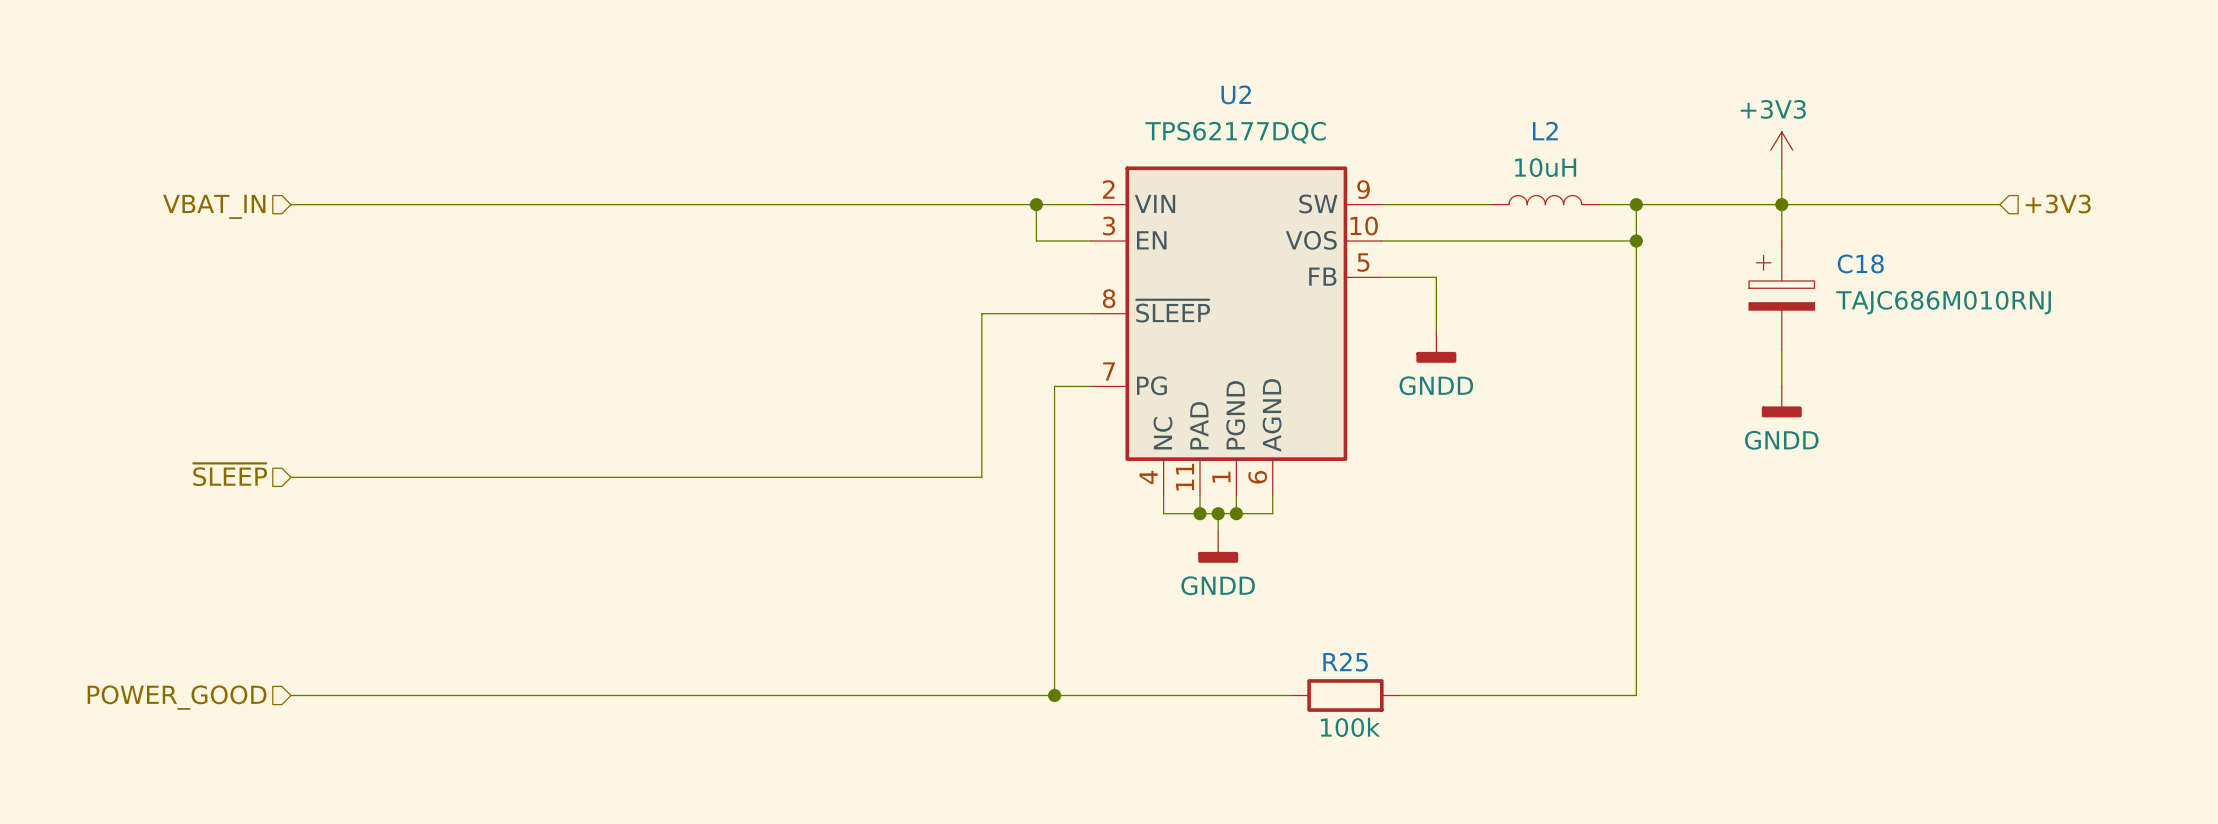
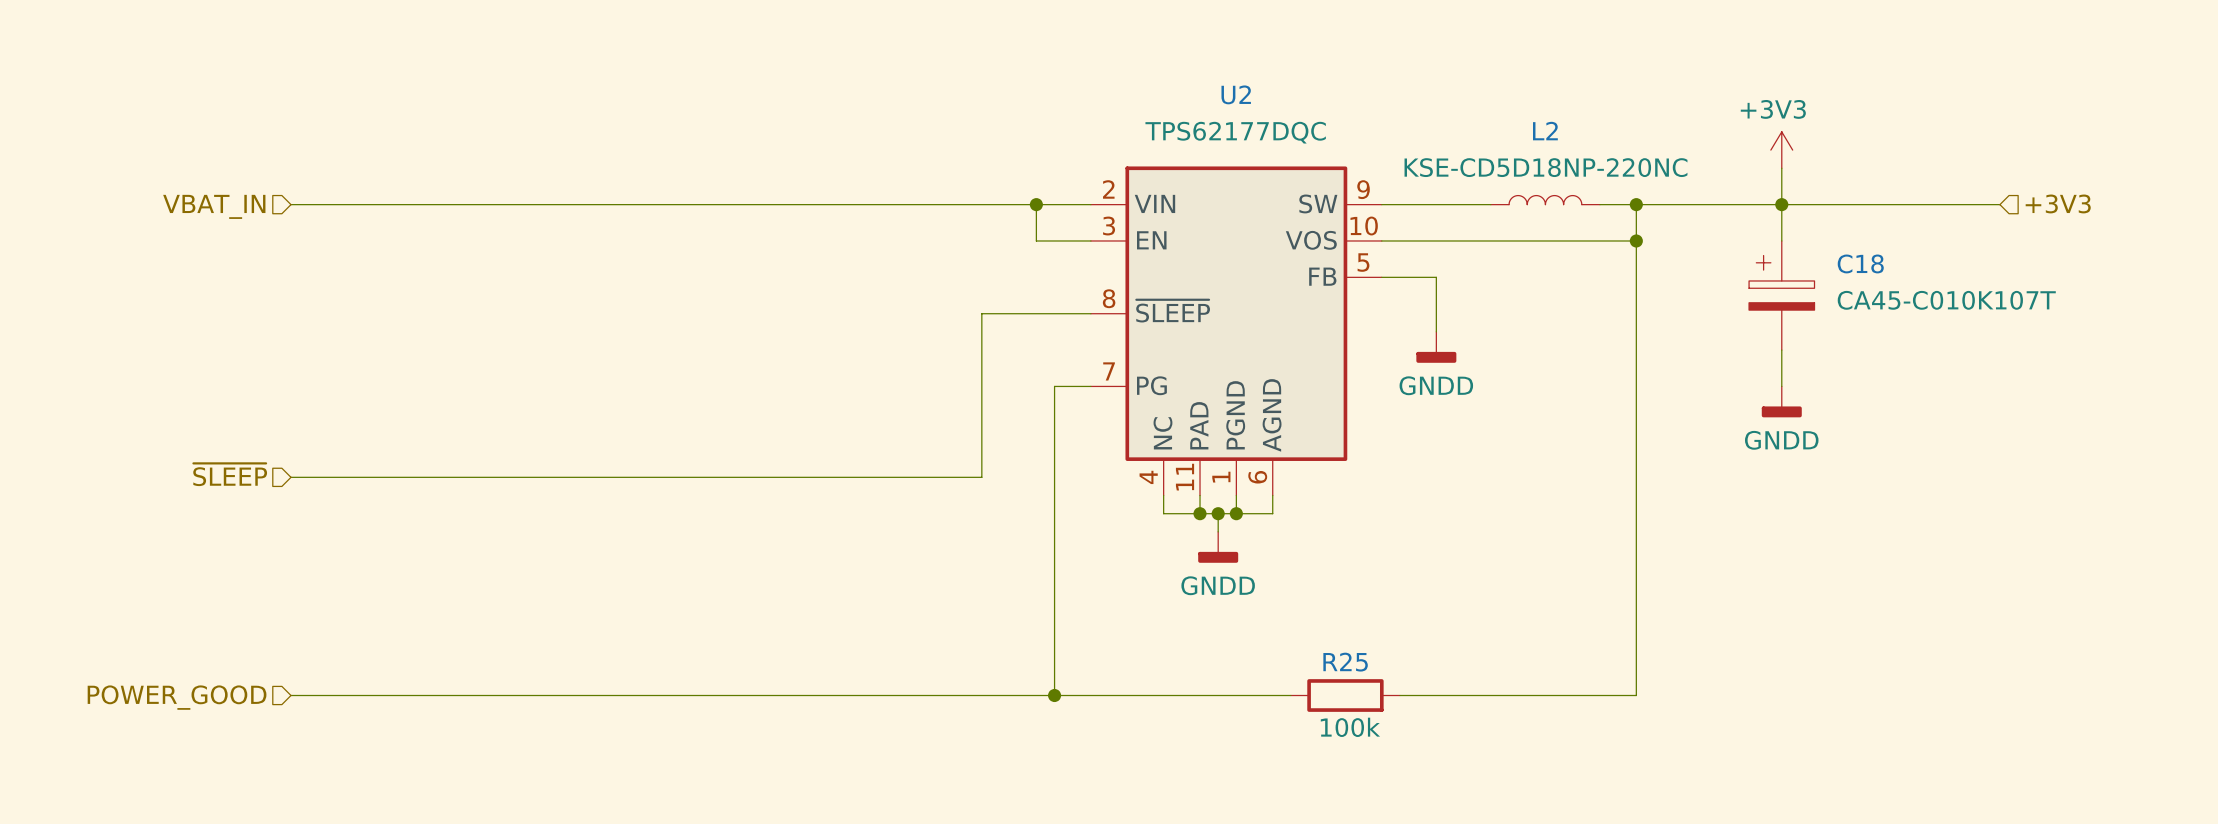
L2 value: 10uH (1545, 167) -> KSE-CD5D18NP-220NC (1545, 167)
C18 value: TAJC686M010RNJ (1943, 302) -> CA45-C010K107T (1946, 300)

